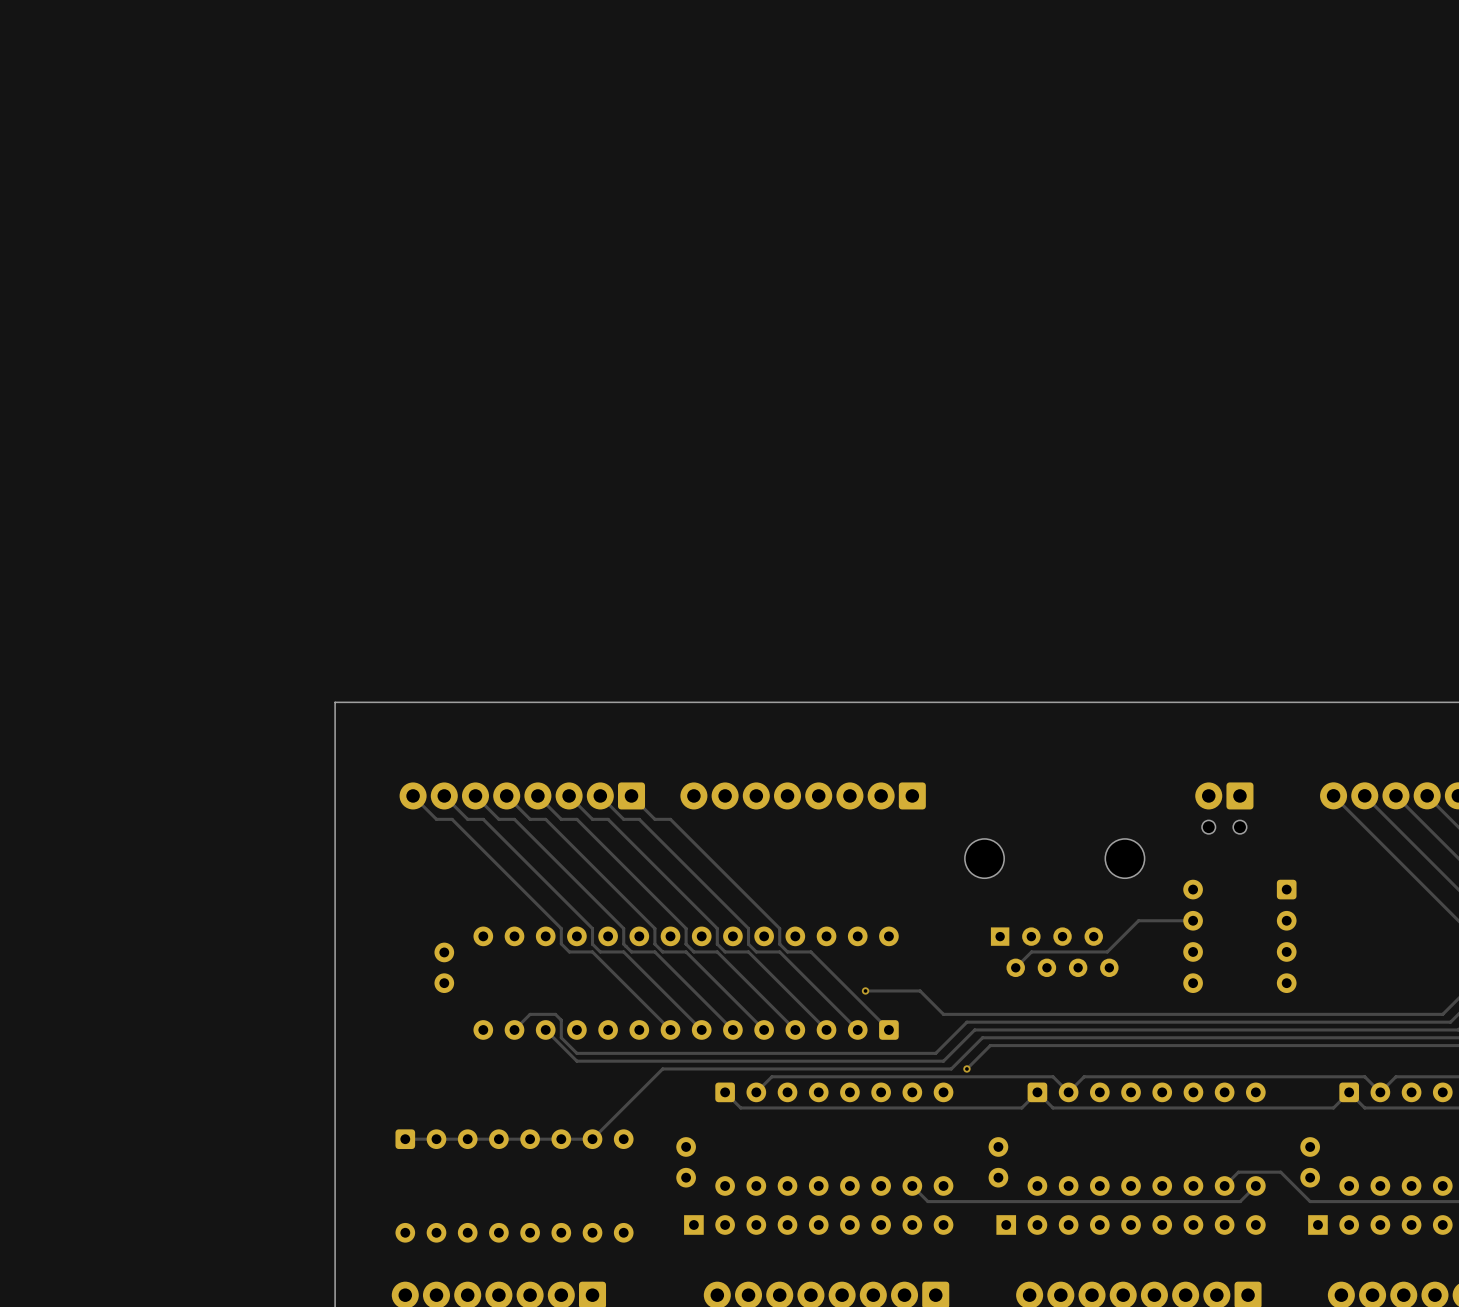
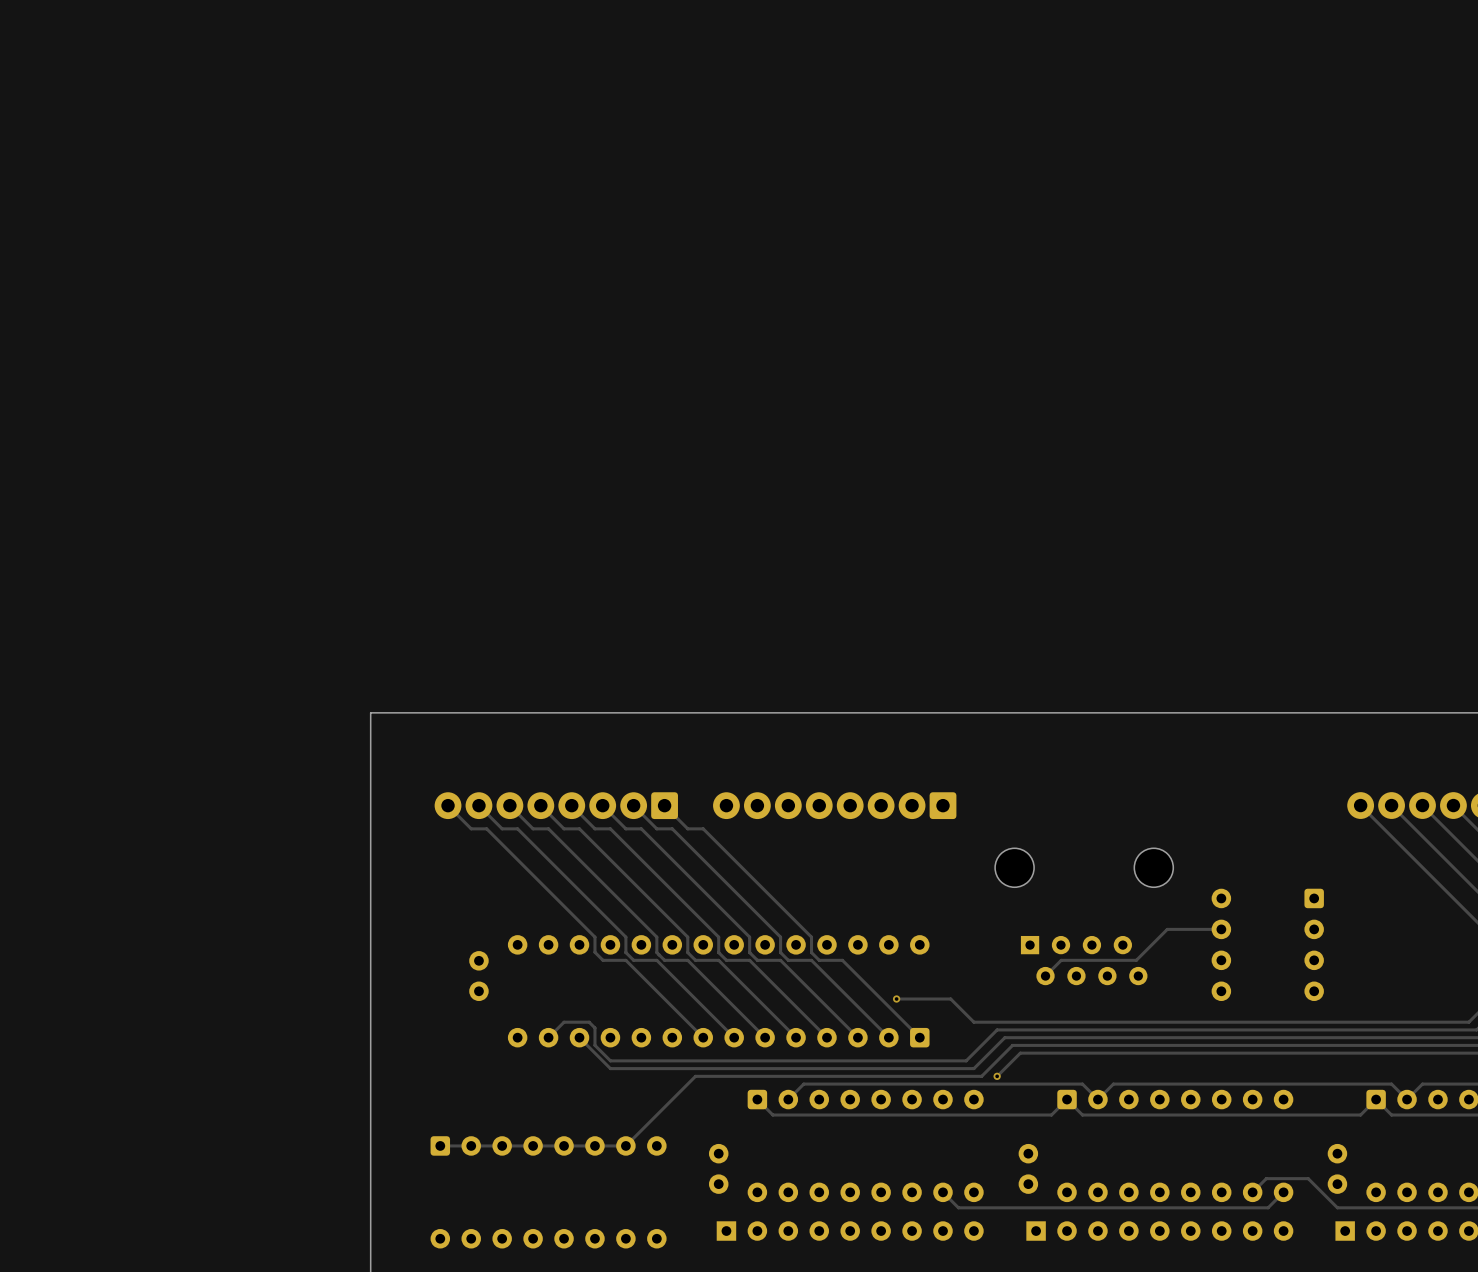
part: (1224, 808) -> none

